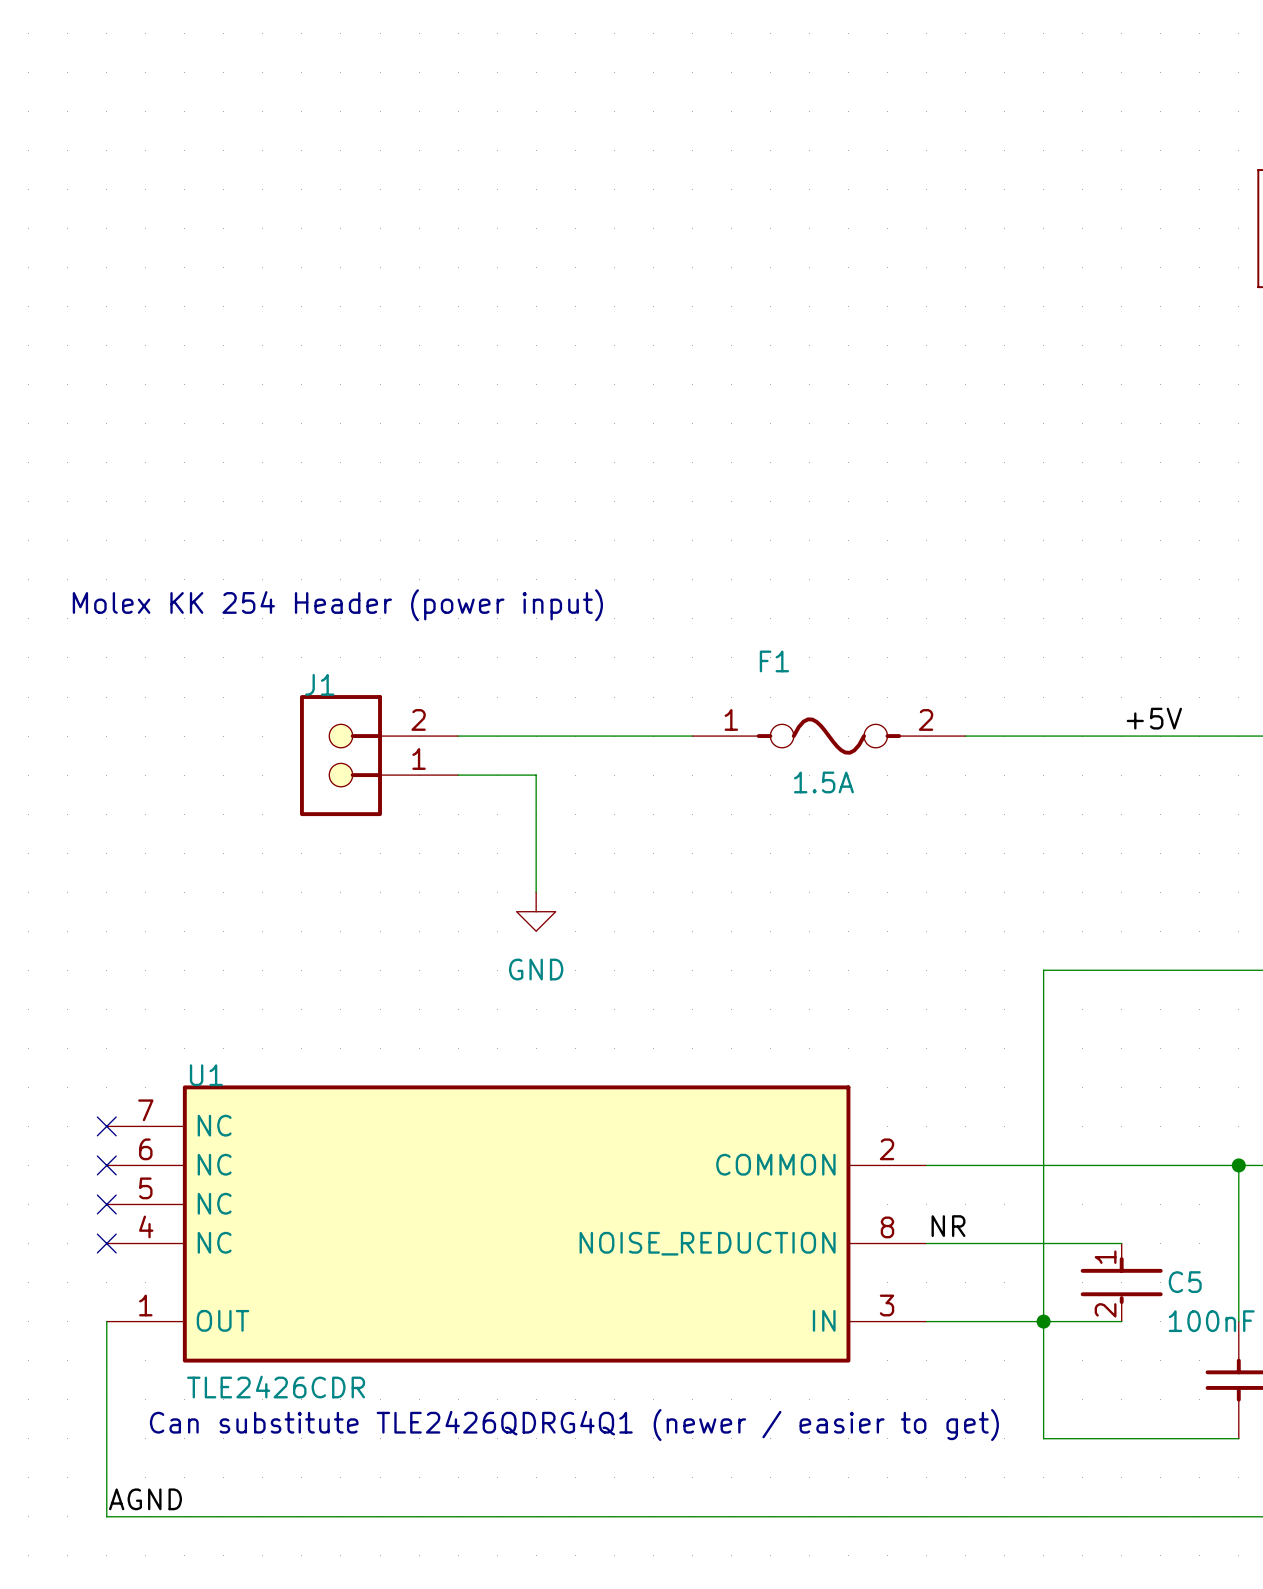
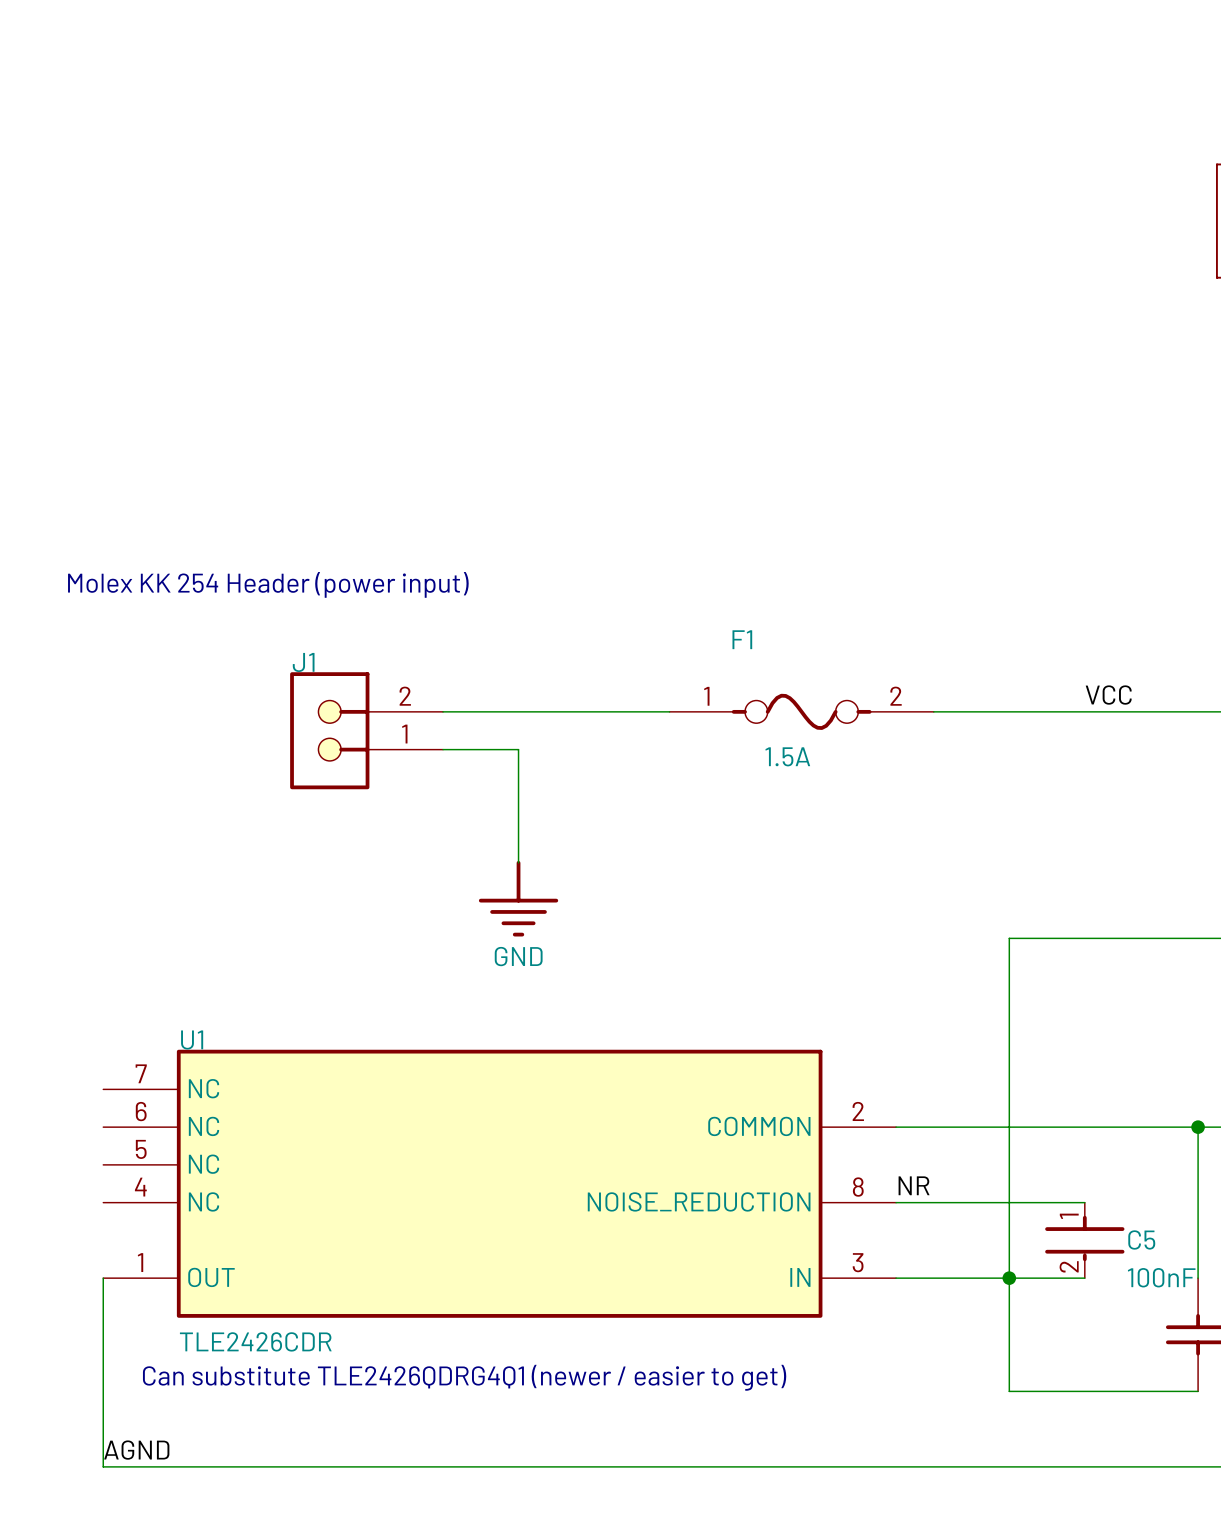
label: +5V (1154, 718) -> VCC (1108, 695)
power symbol: GND (536, 911) -> none
power symbol: none -> GND (518, 898)
no-connect mark: (106, 1126) -> none
no-connect mark: (106, 1165) -> none
no-connect mark: (106, 1204) -> none
no-connect mark: (106, 1243) -> none

